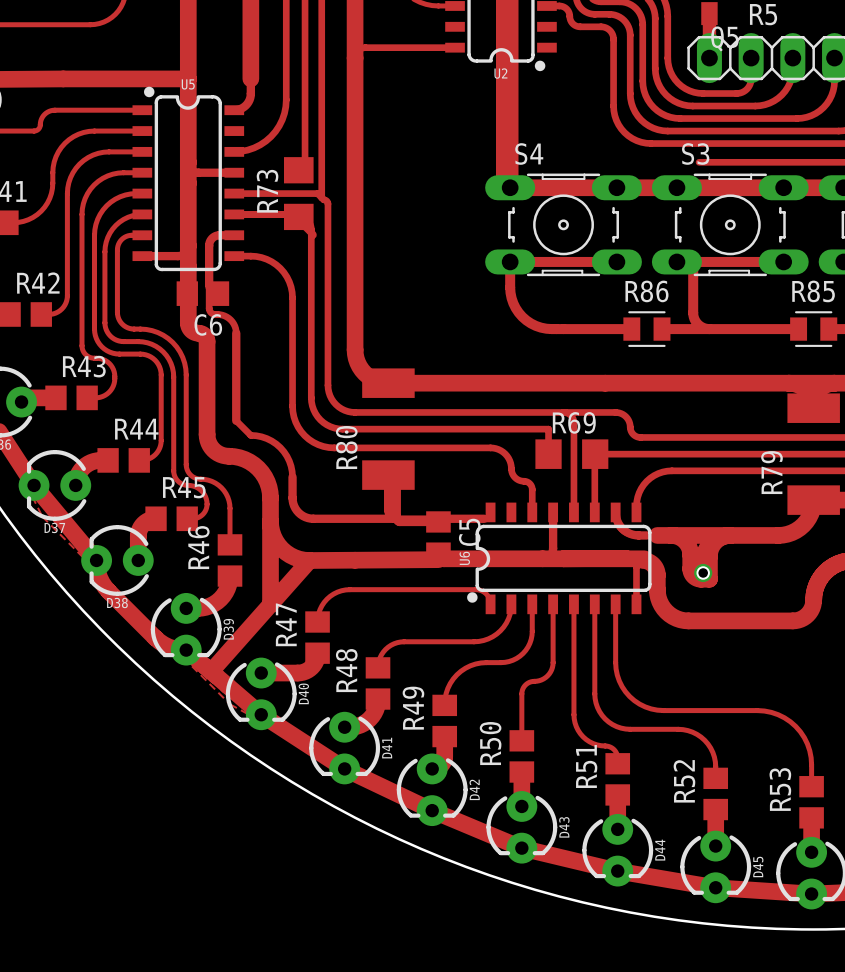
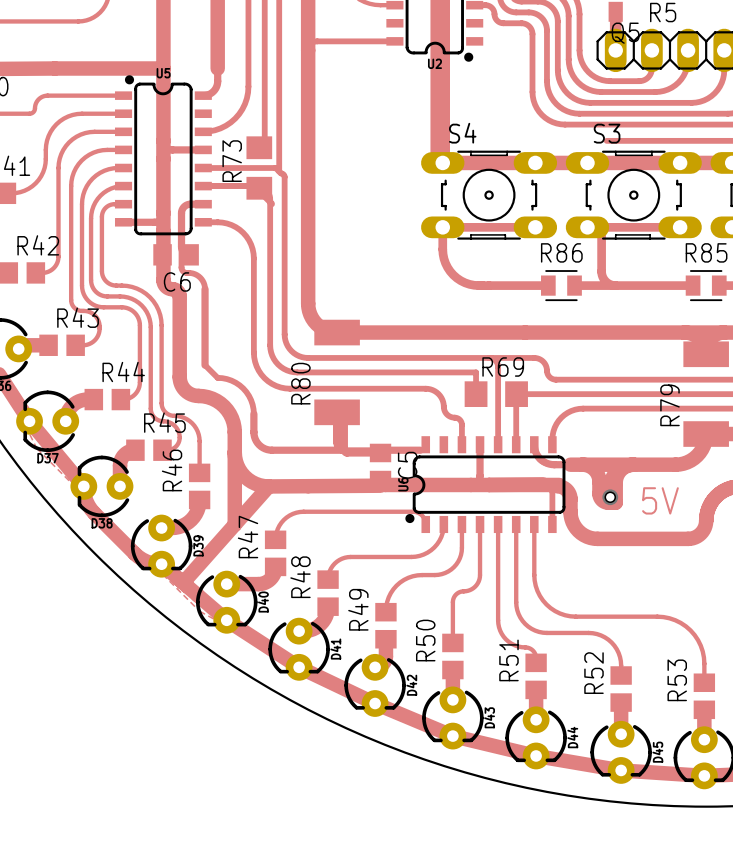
text: none -> 5V (660, 500)

